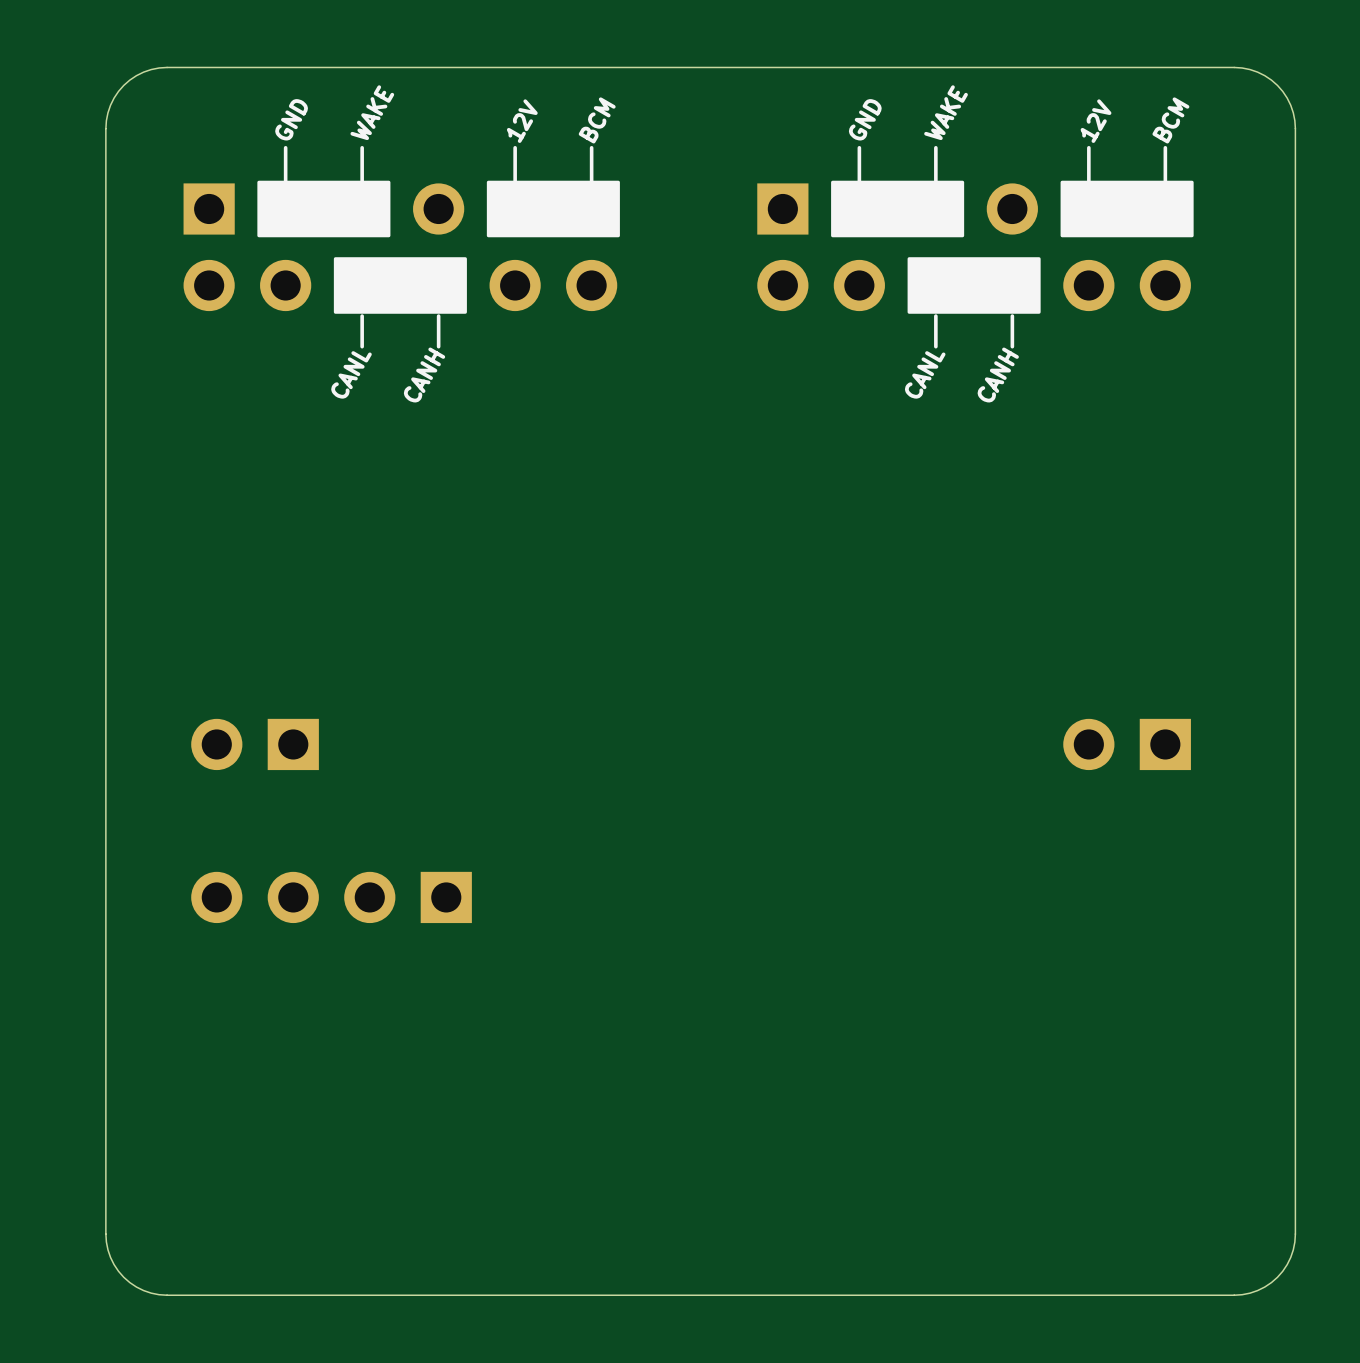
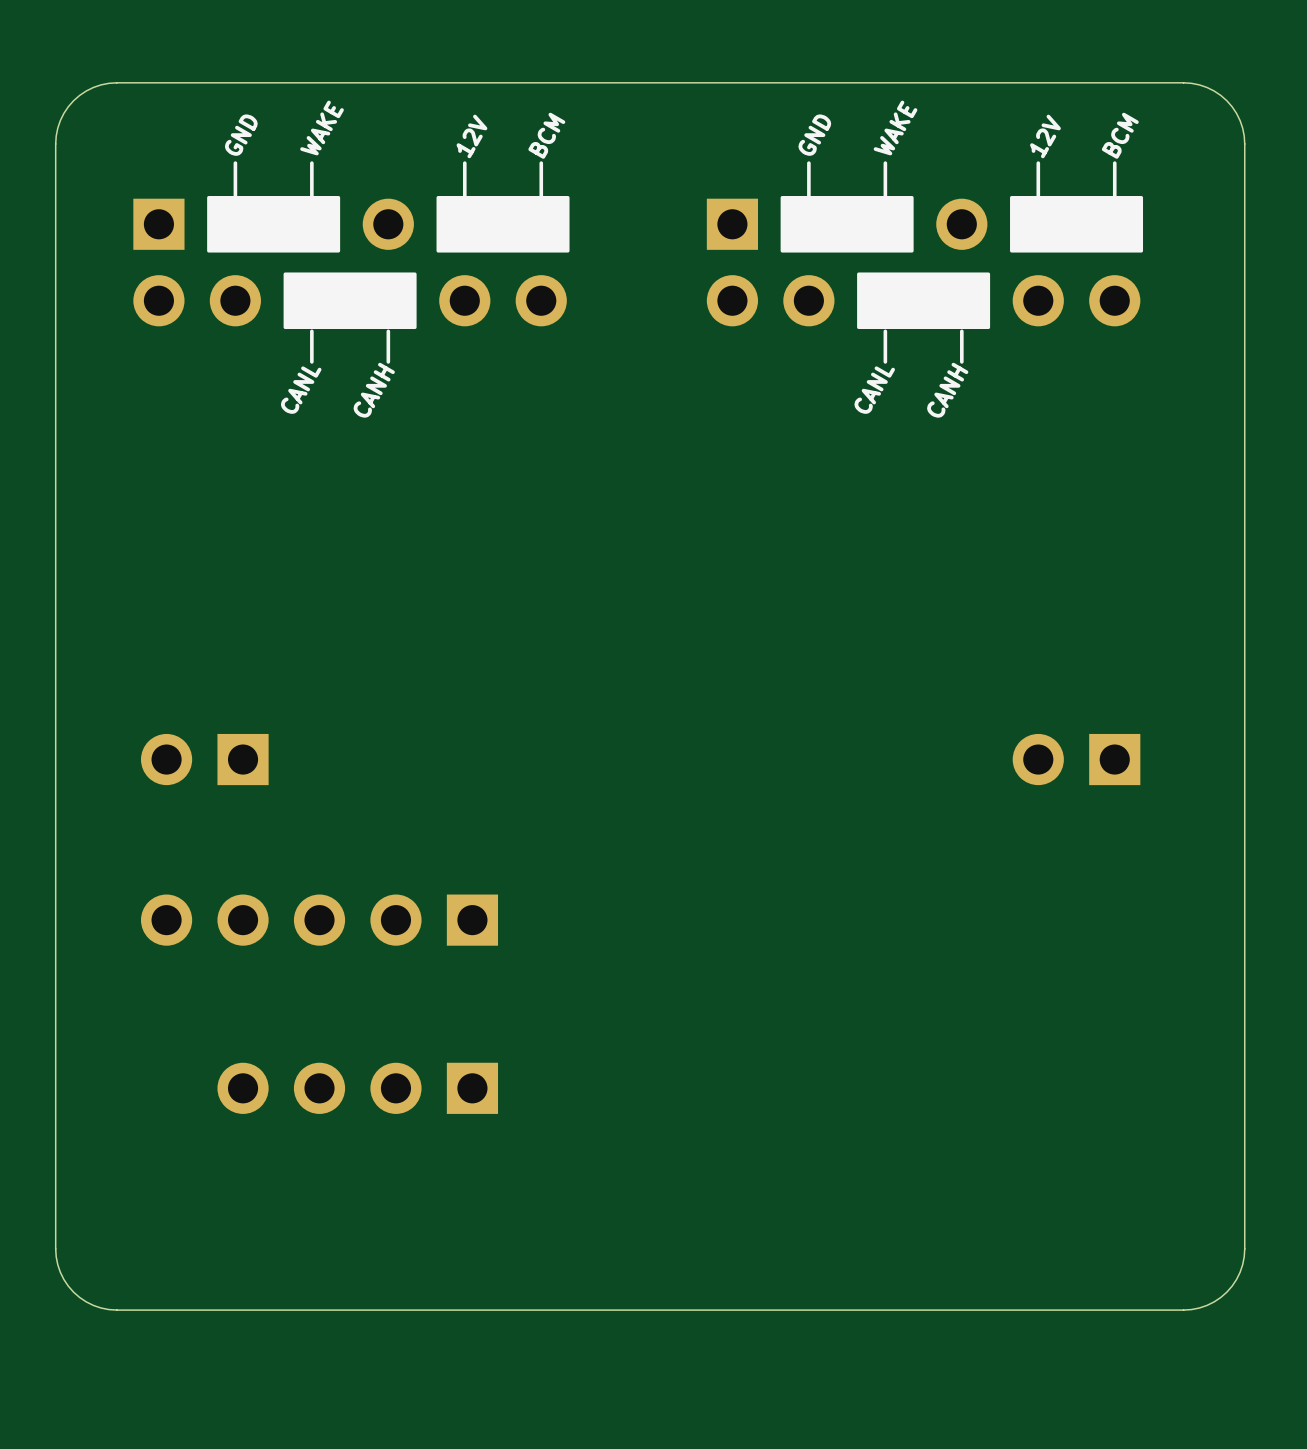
part position: (331, 897) -> (357, 1088)
part: none -> (319, 920)

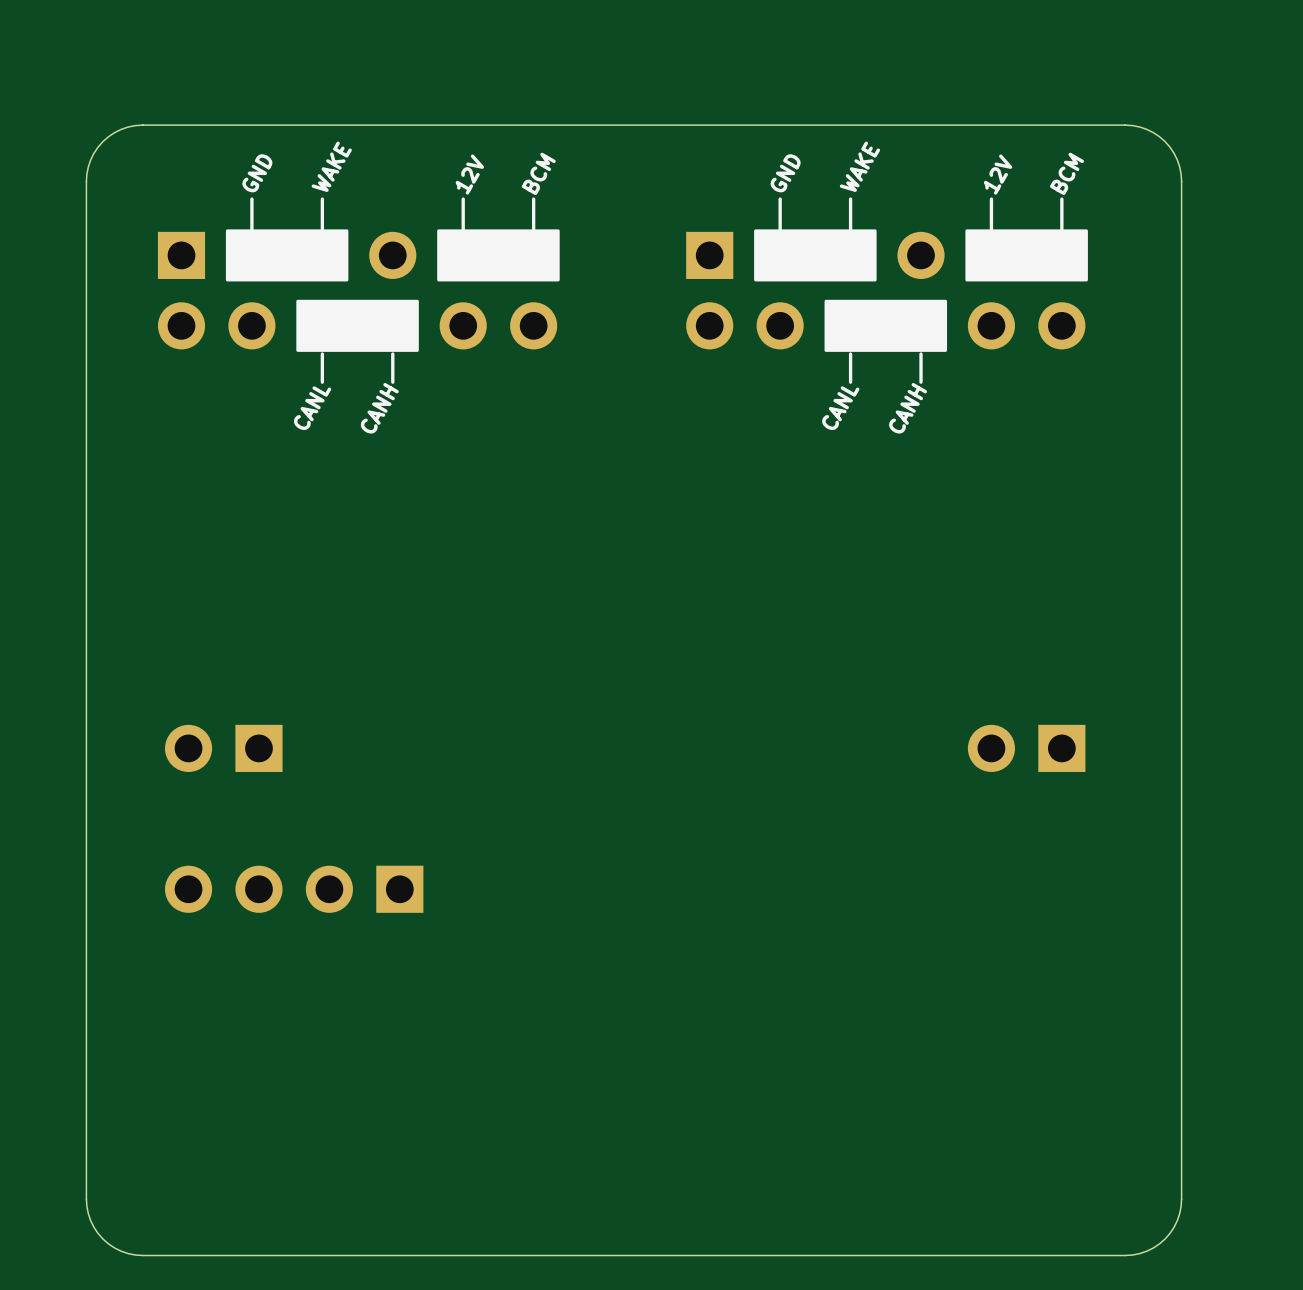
part: (319, 920) -> none
part position: (357, 1088) -> (294, 889)

